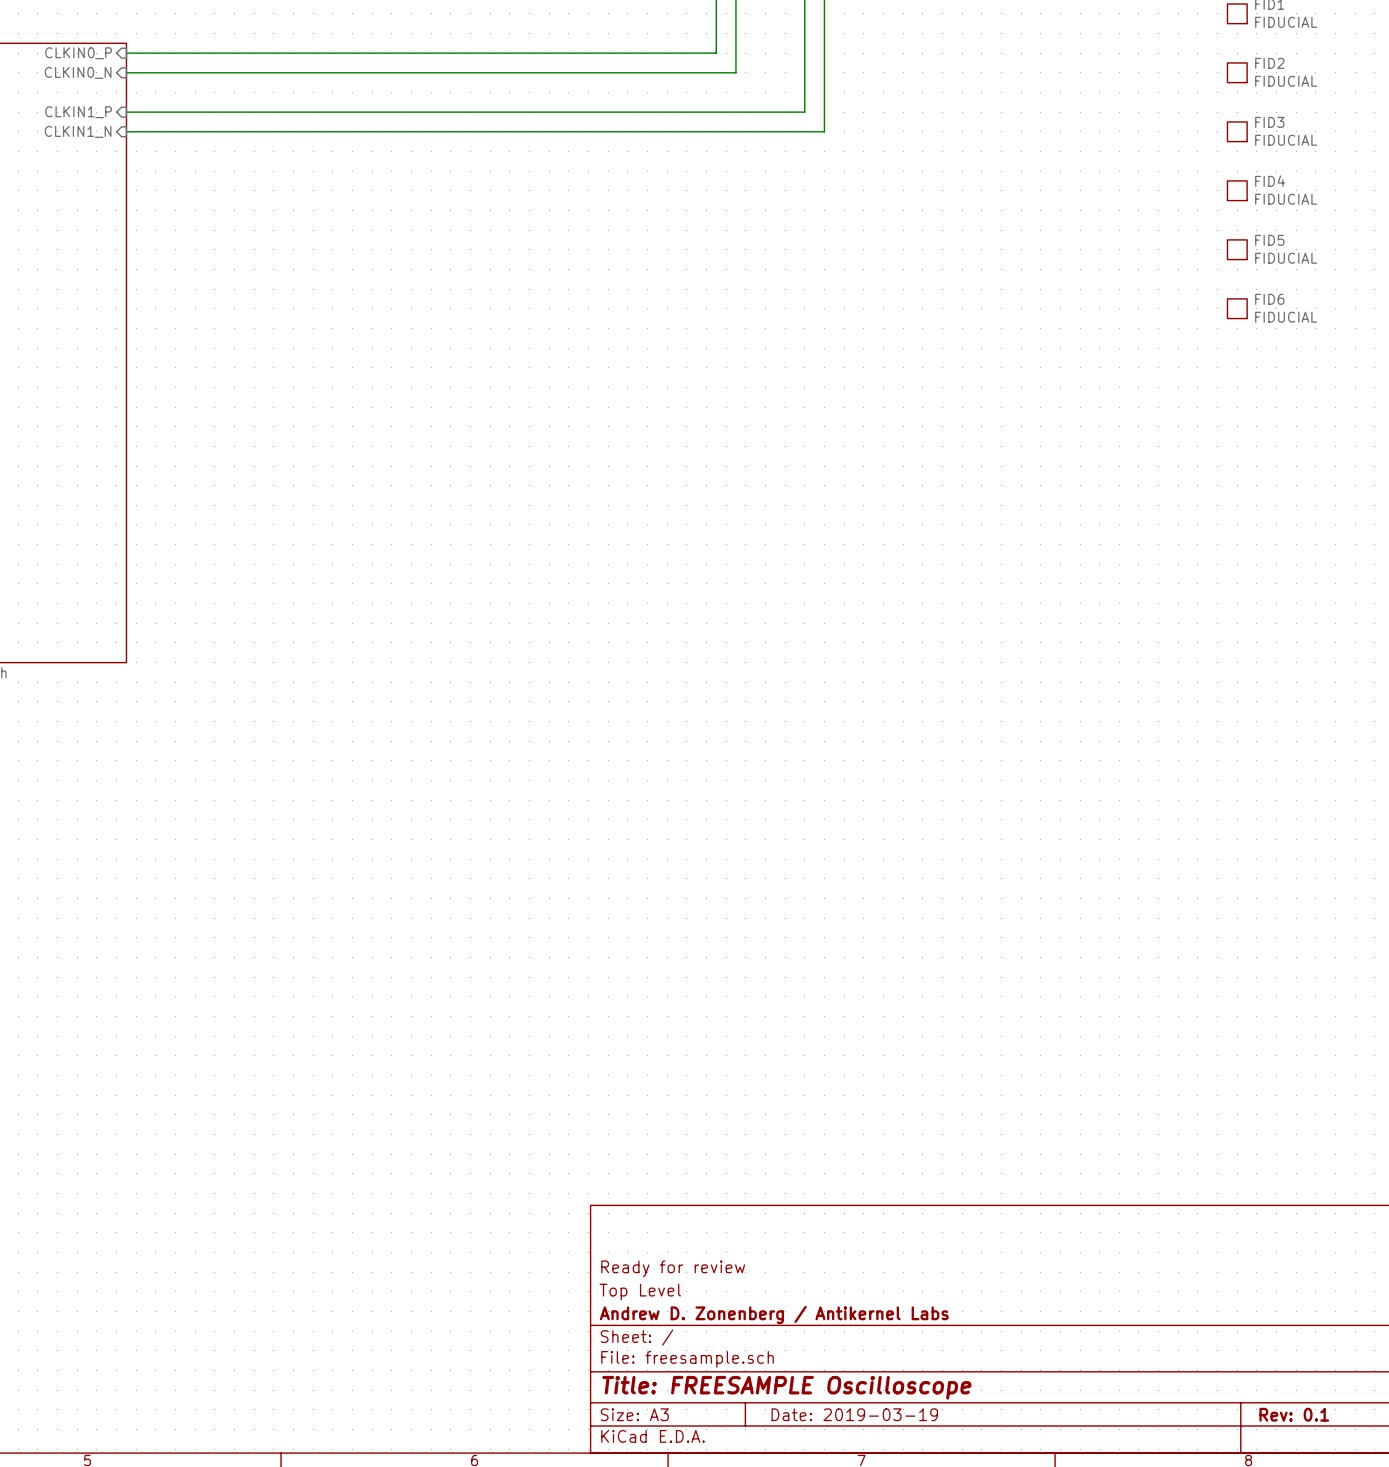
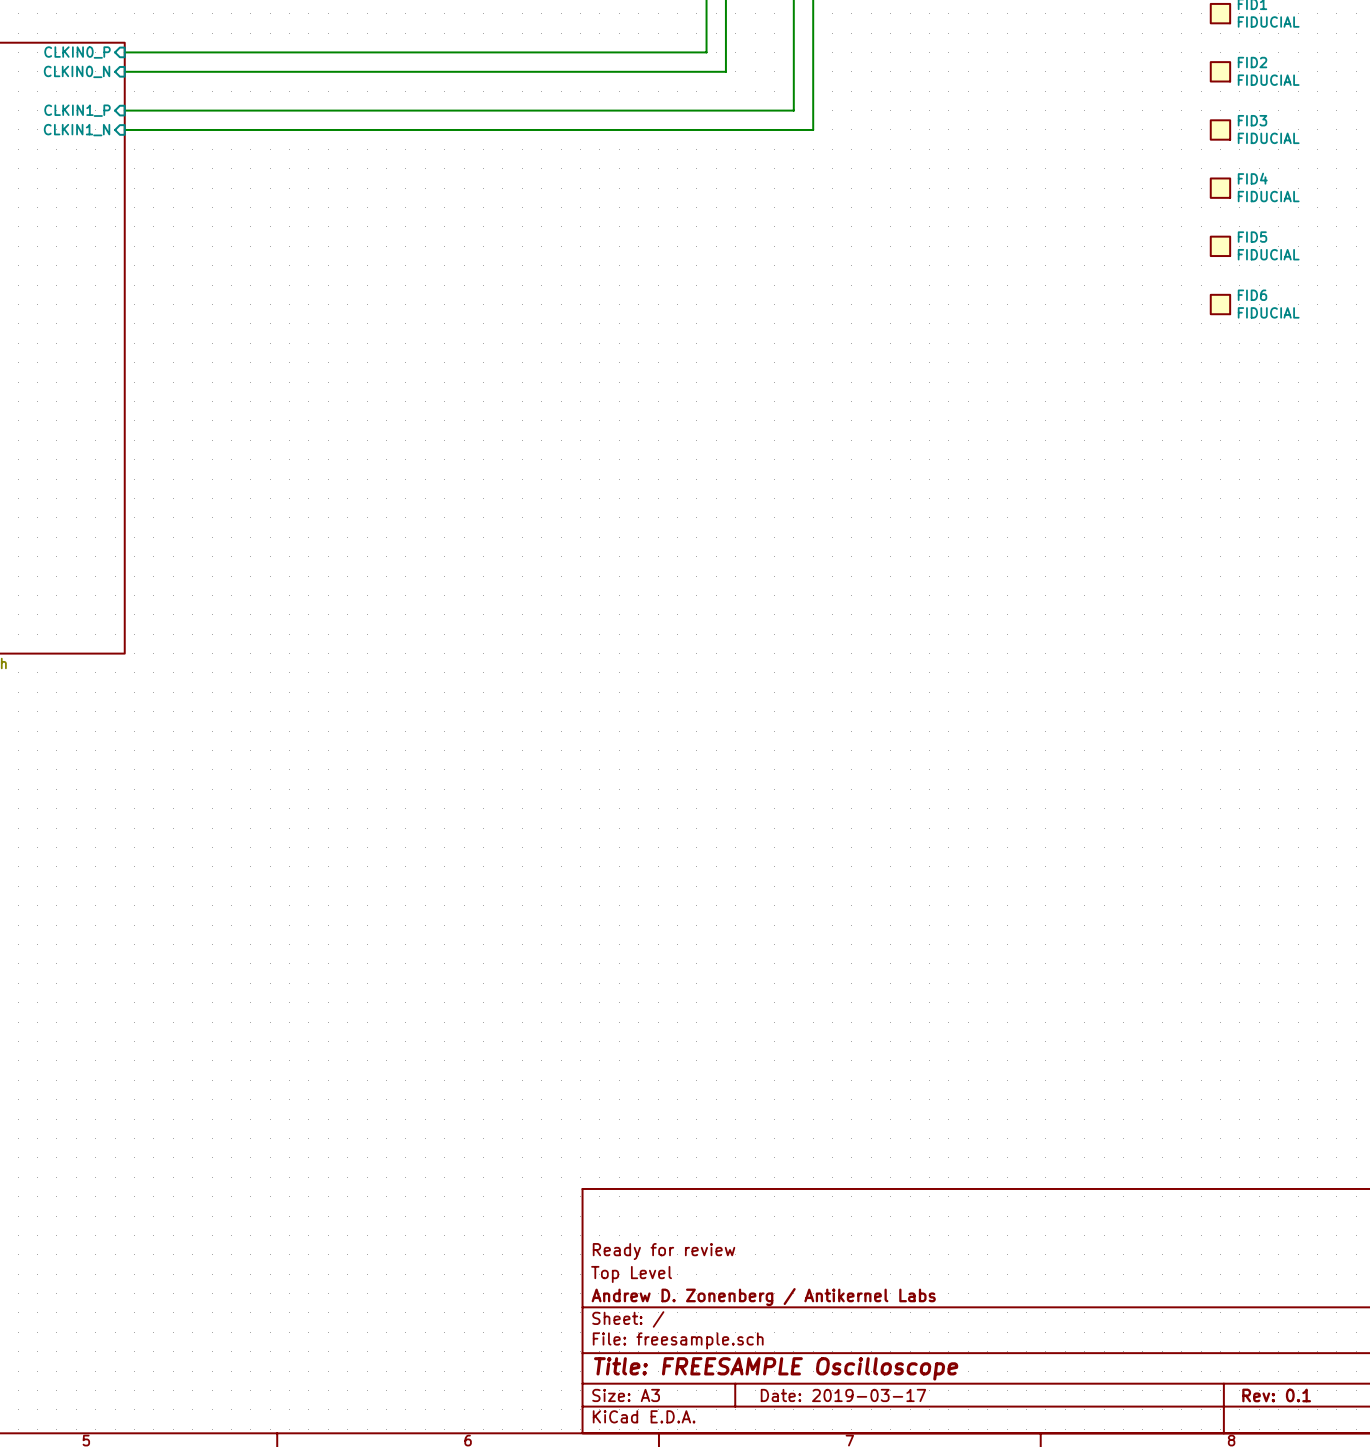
title block: Date: 2019-03-19 (854, 1414) -> Date: 2019-03-17 (843, 1395)

